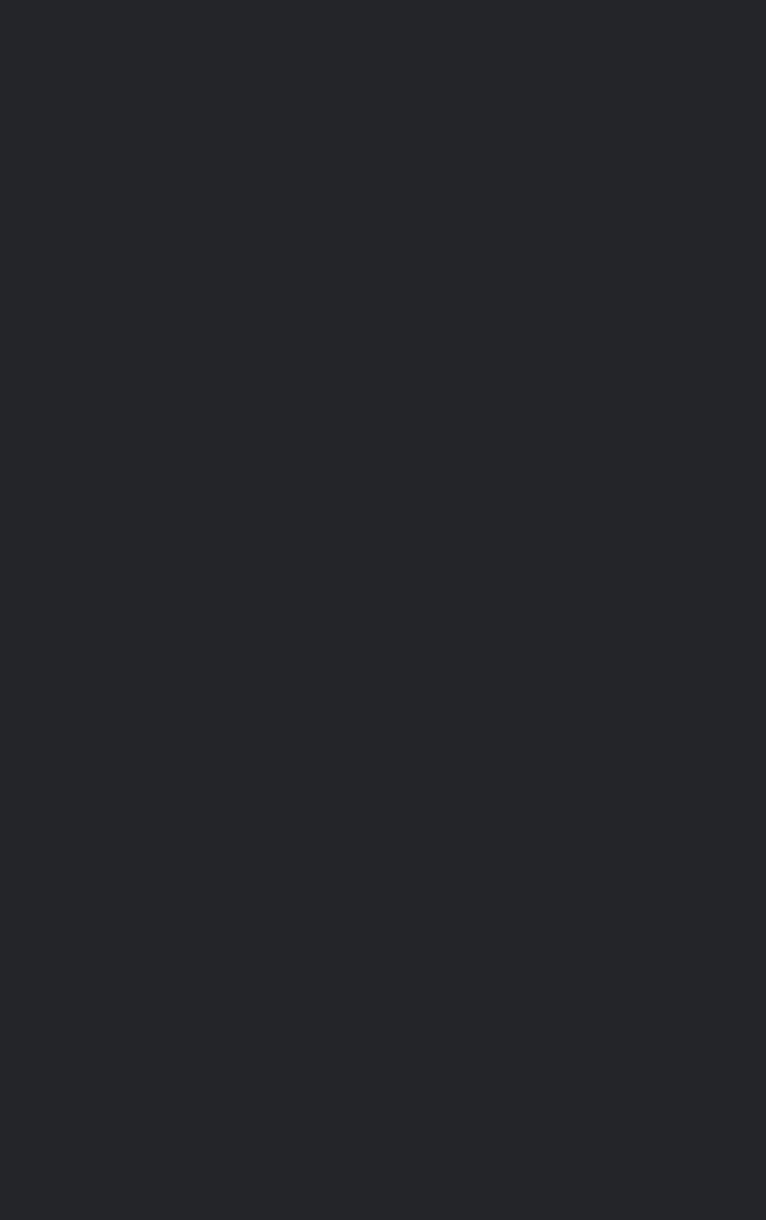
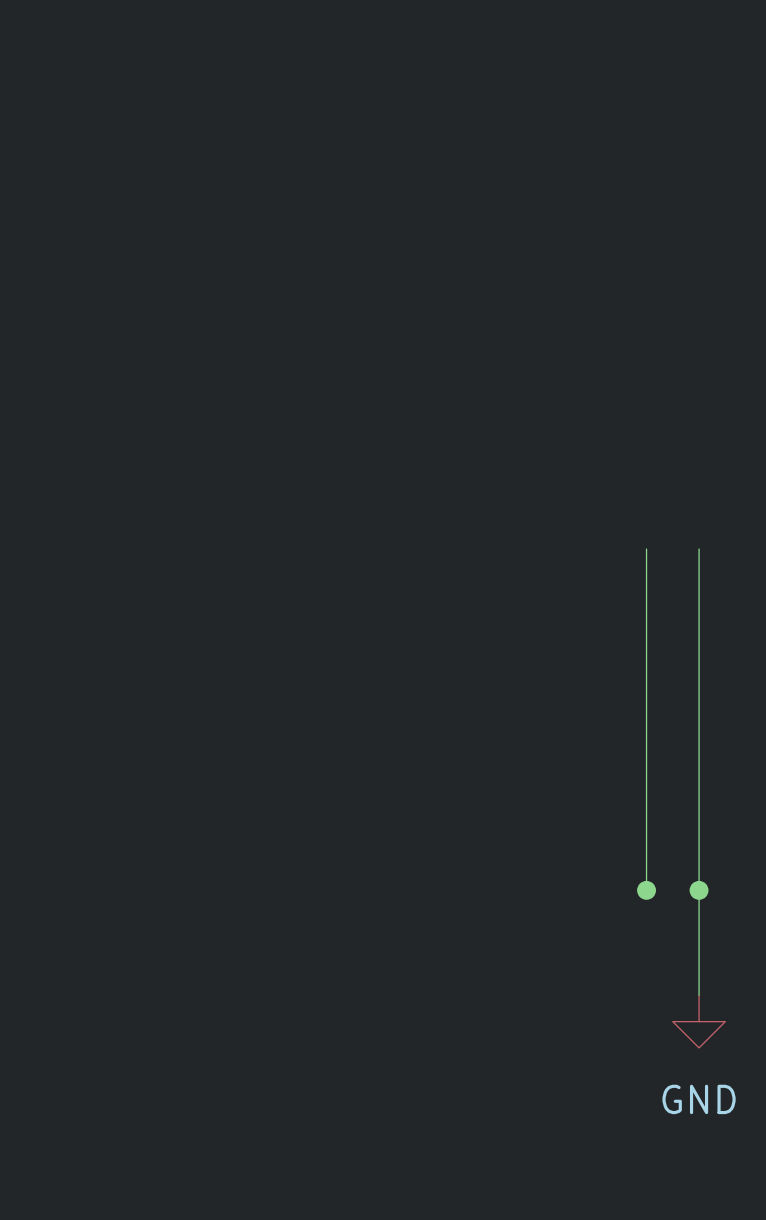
wire: none -> (646, 549) (646, 890)
wire: none -> (699, 549) (699, 995)
junction: none -> (646, 890)
junction: none -> (699, 890)
power symbol: none -> GND (699, 1021)

